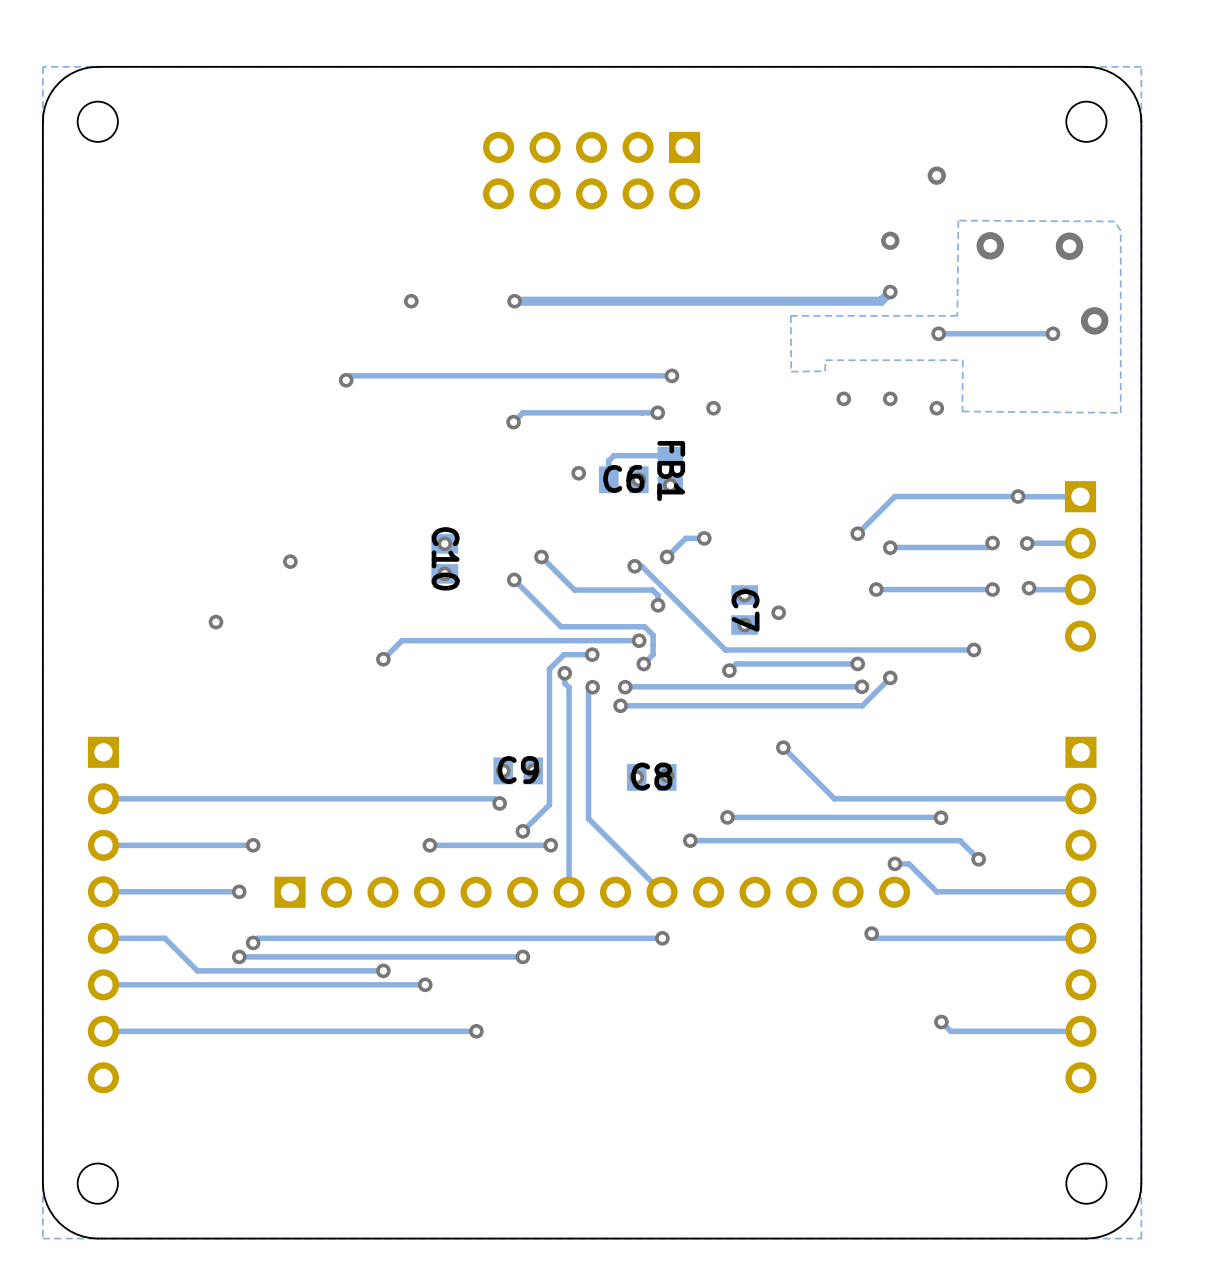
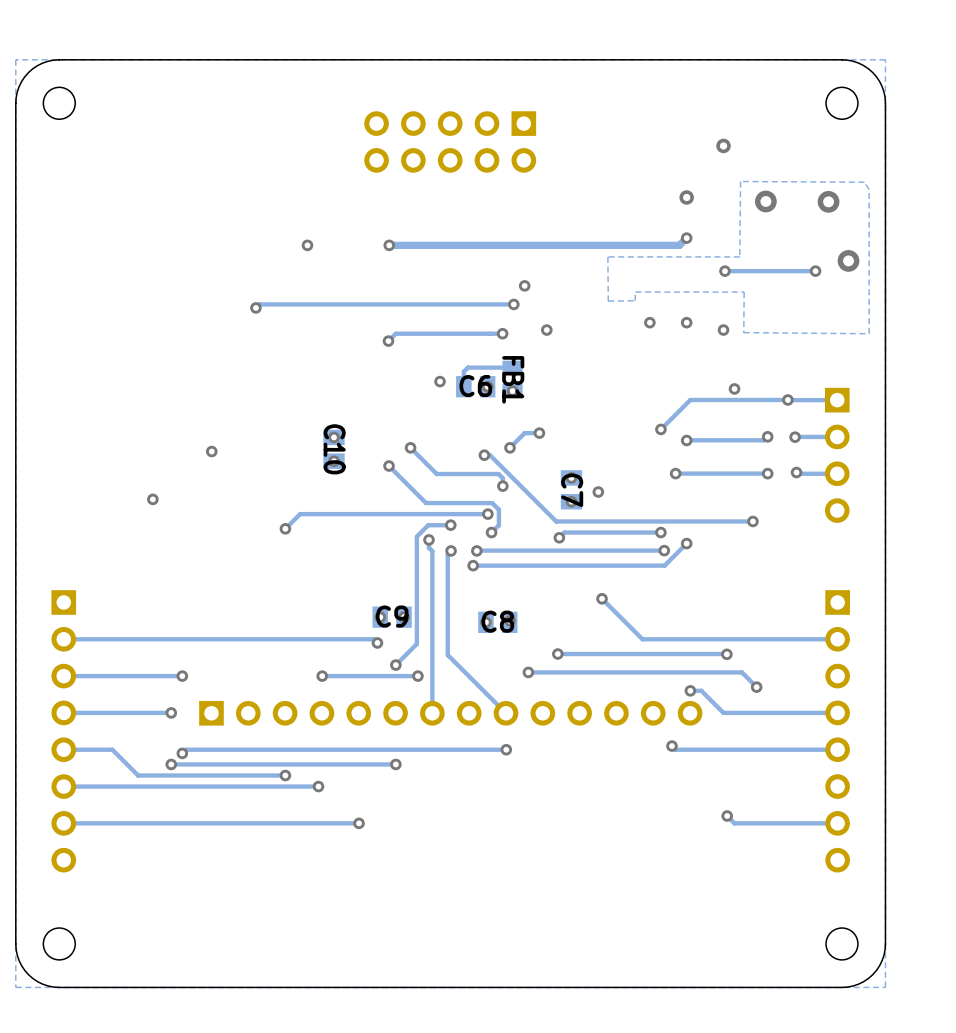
via: none -> (524, 285)
via: none -> (734, 388)

